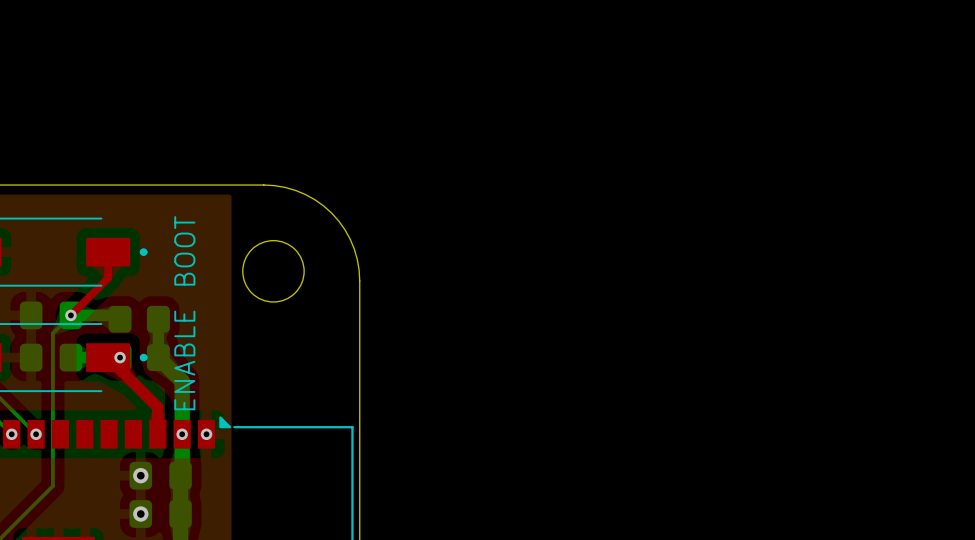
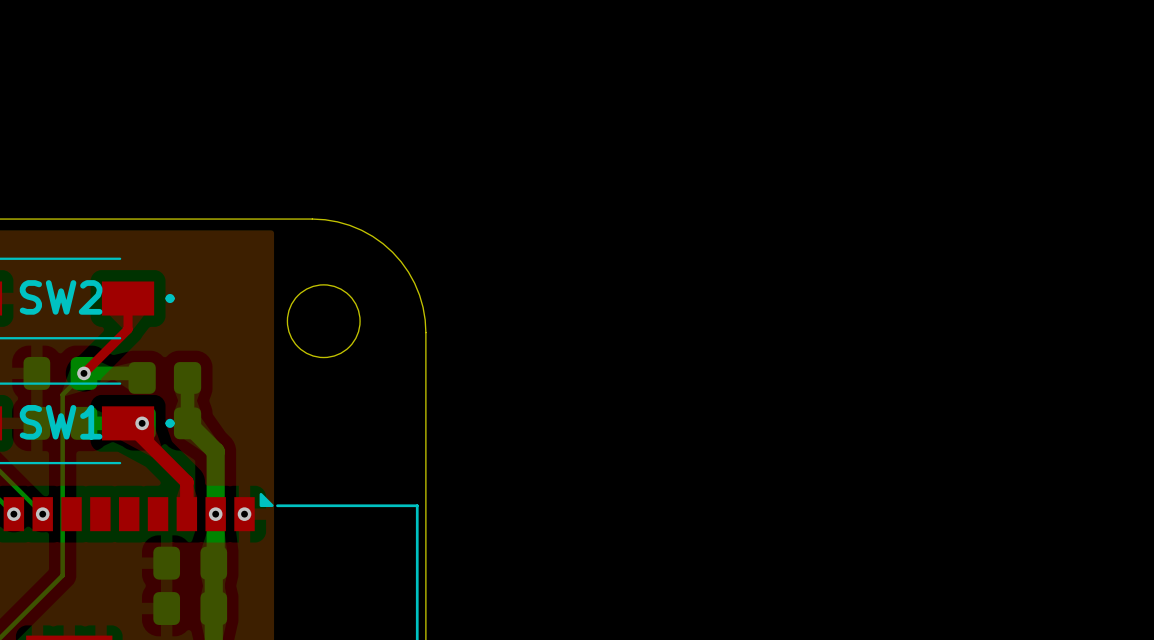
text: BOOT (184, 250) -> none
SW2 name: none -> SW2 (61, 297)
SW1 name: none -> SW1 (61, 422)
text: ENABLE (184, 360) -> none
via: (140, 475) -> none
via: (140, 514) -> none

